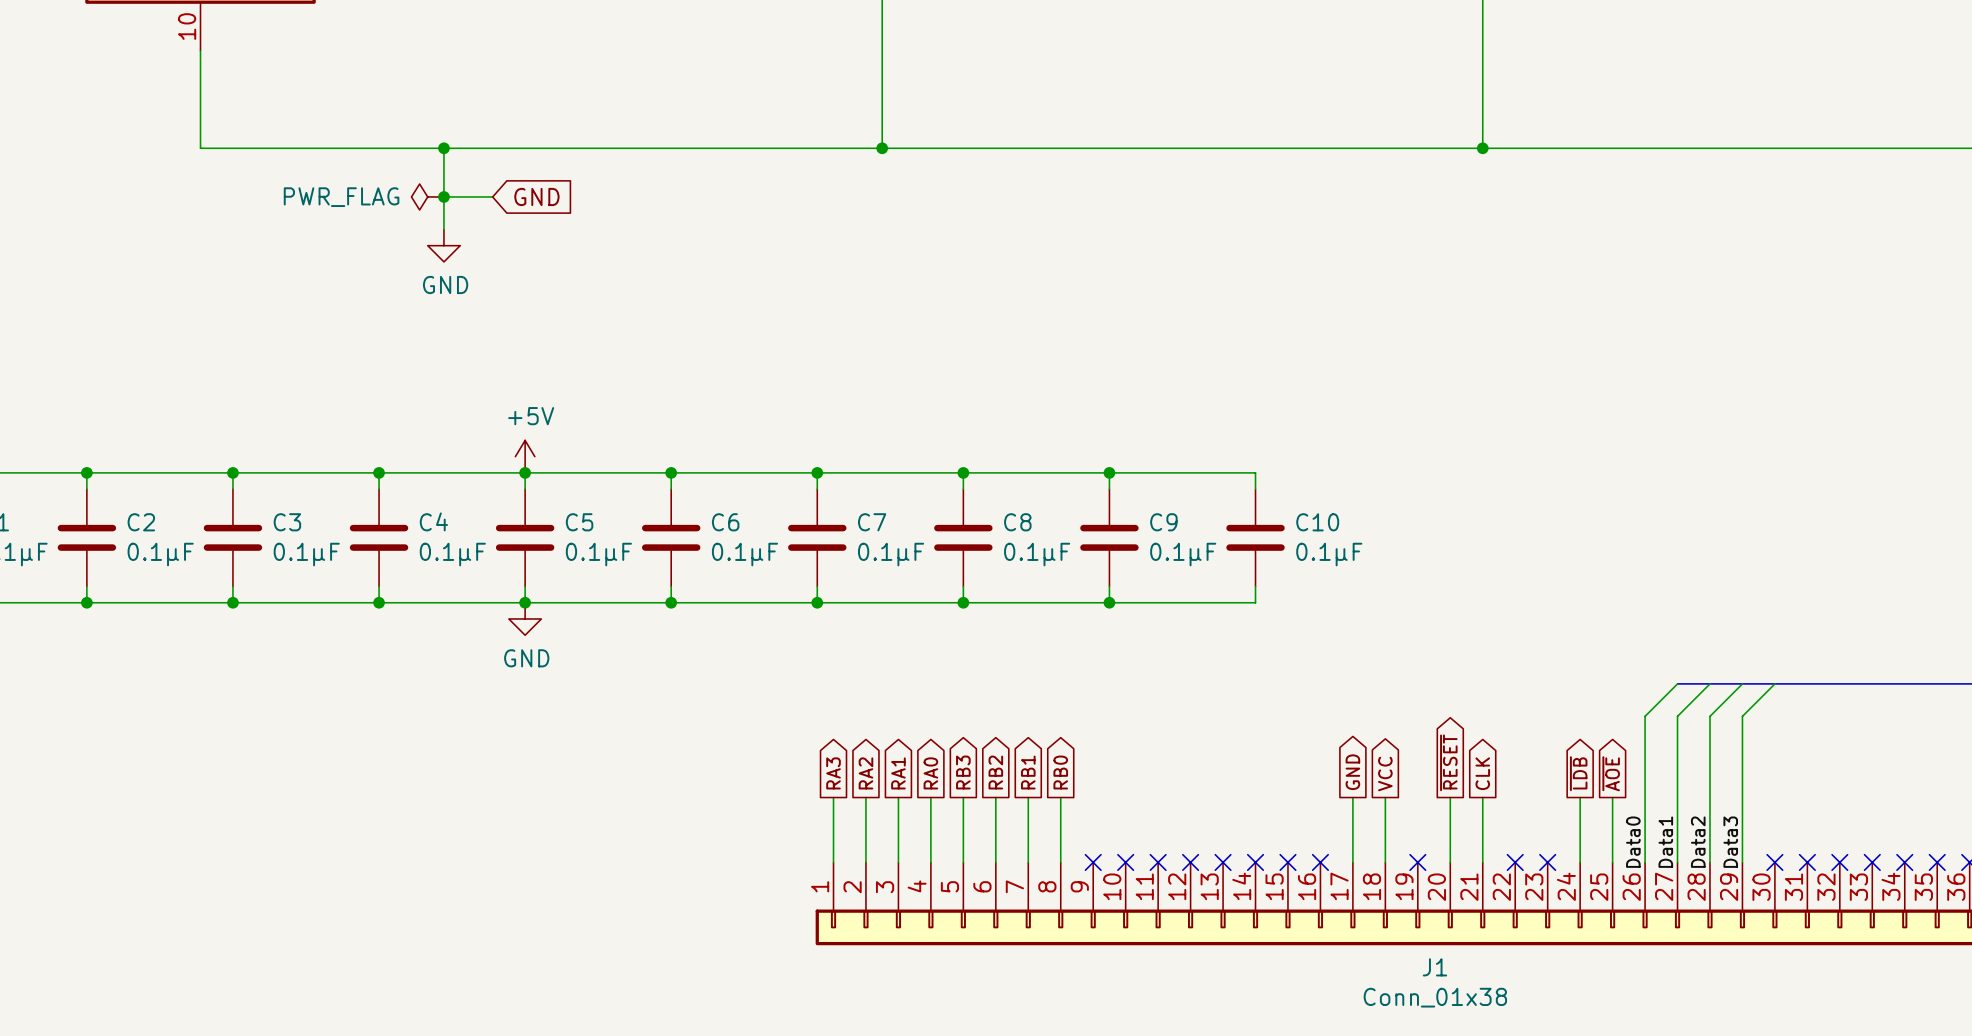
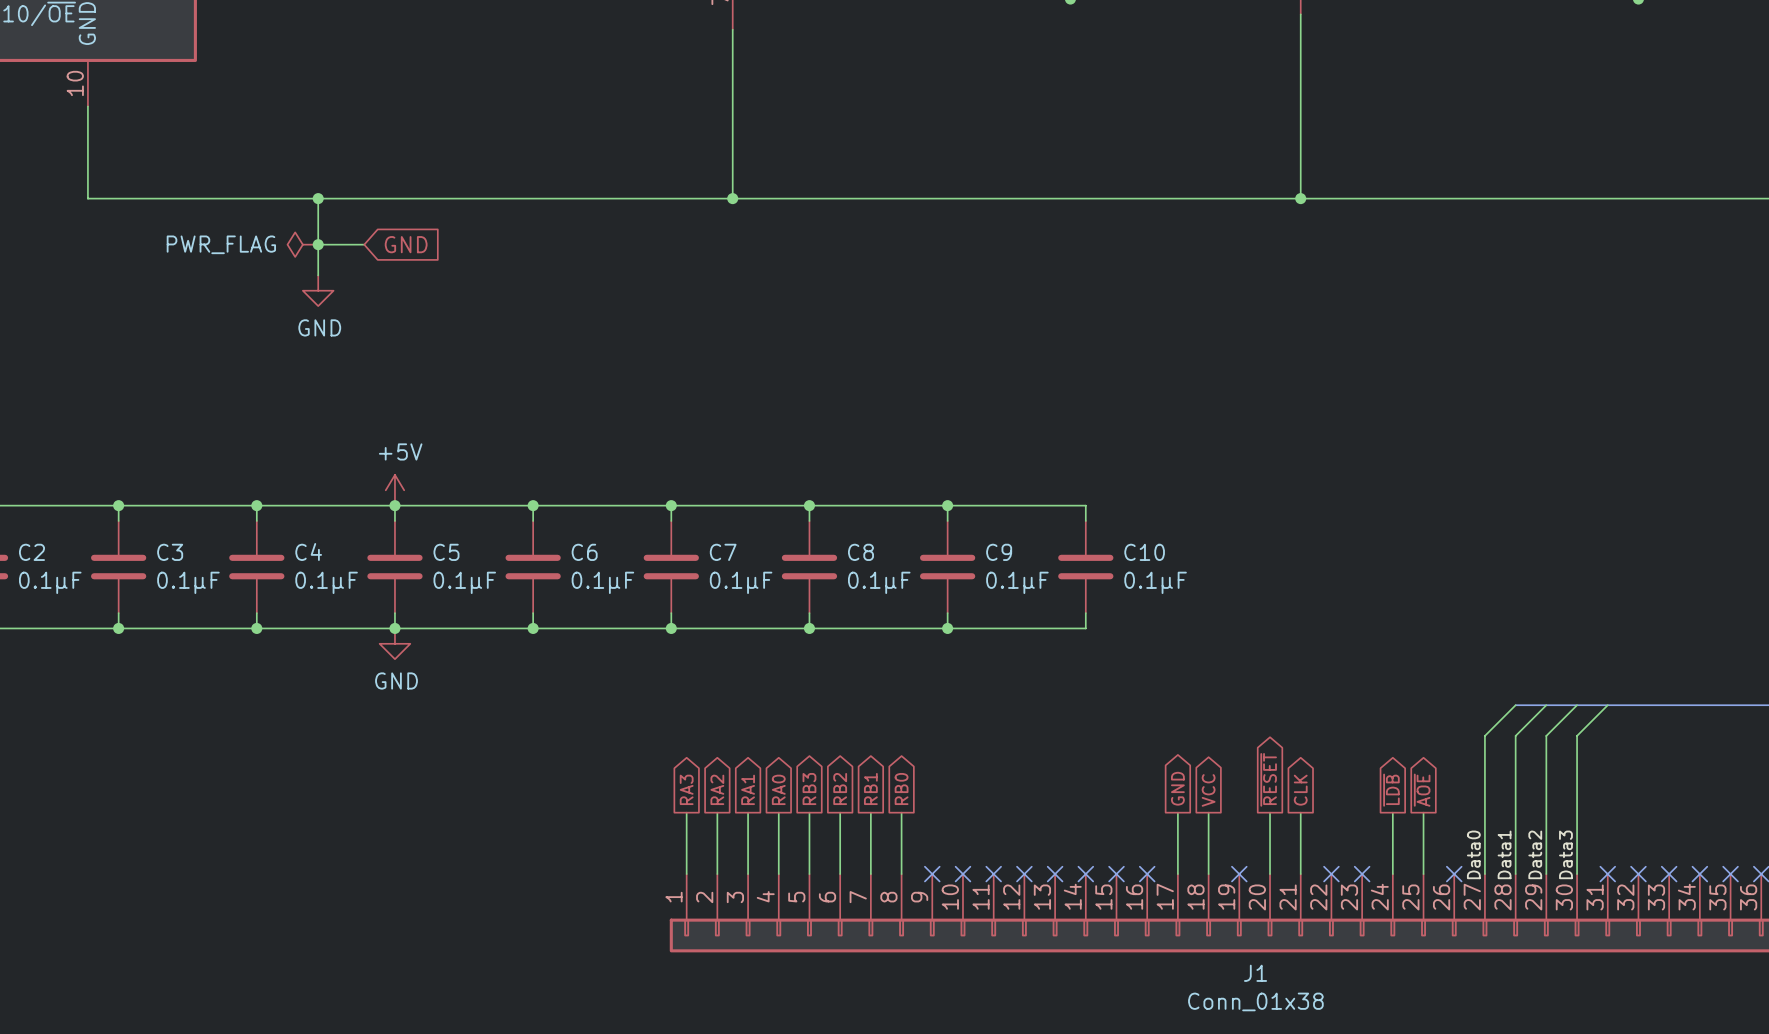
wire: (1677, 683) (1645, 716) (1645, 862) -> (1607, 705) (1577, 735) (1577, 874)
bus: (1677, 683) (1709, 683) -> none
label: Data0 (1633, 842) -> none
label: Data1 (1665, 842) -> Data0 (1473, 854)
label: Data2 (1698, 842) -> Data1 (1504, 854)
label: Data3 (1730, 842) -> Data2 (1535, 854)
label: none -> Data3 (1565, 854)
no-connect mark: none -> (1454, 874)
no-connect mark: (1774, 862) -> none

